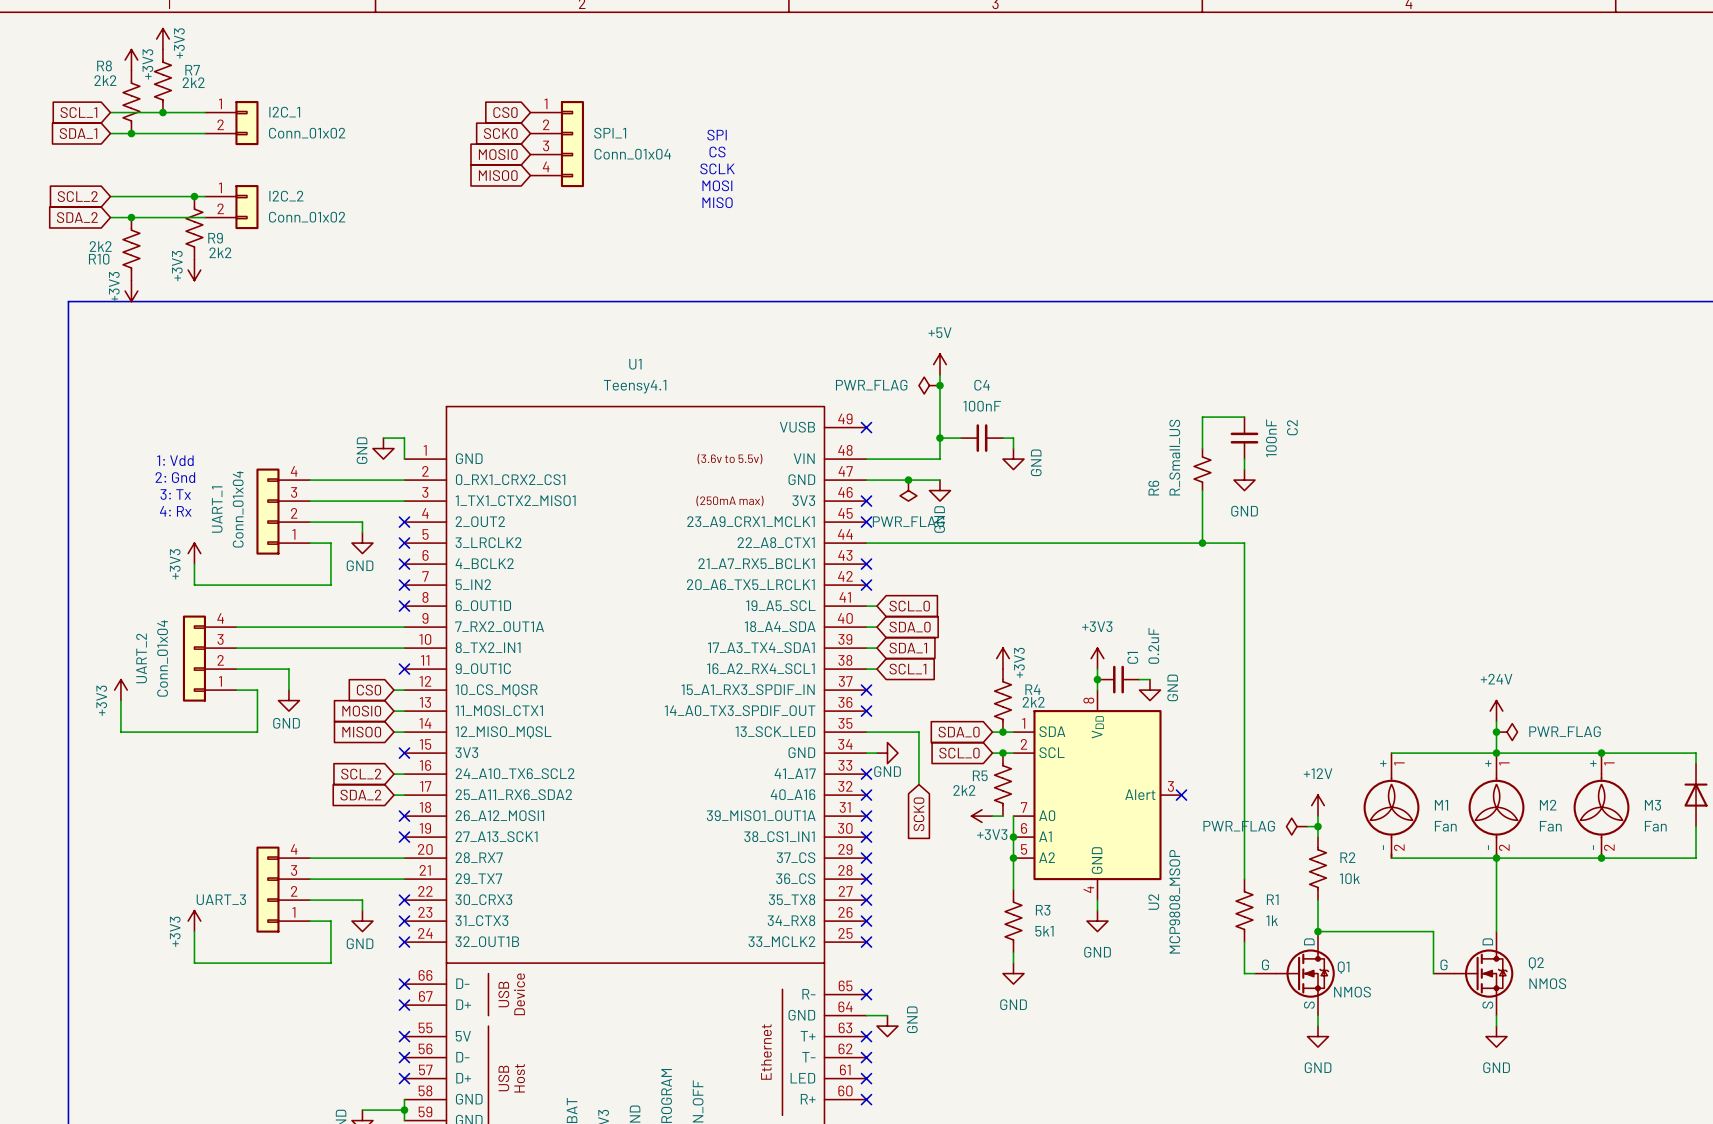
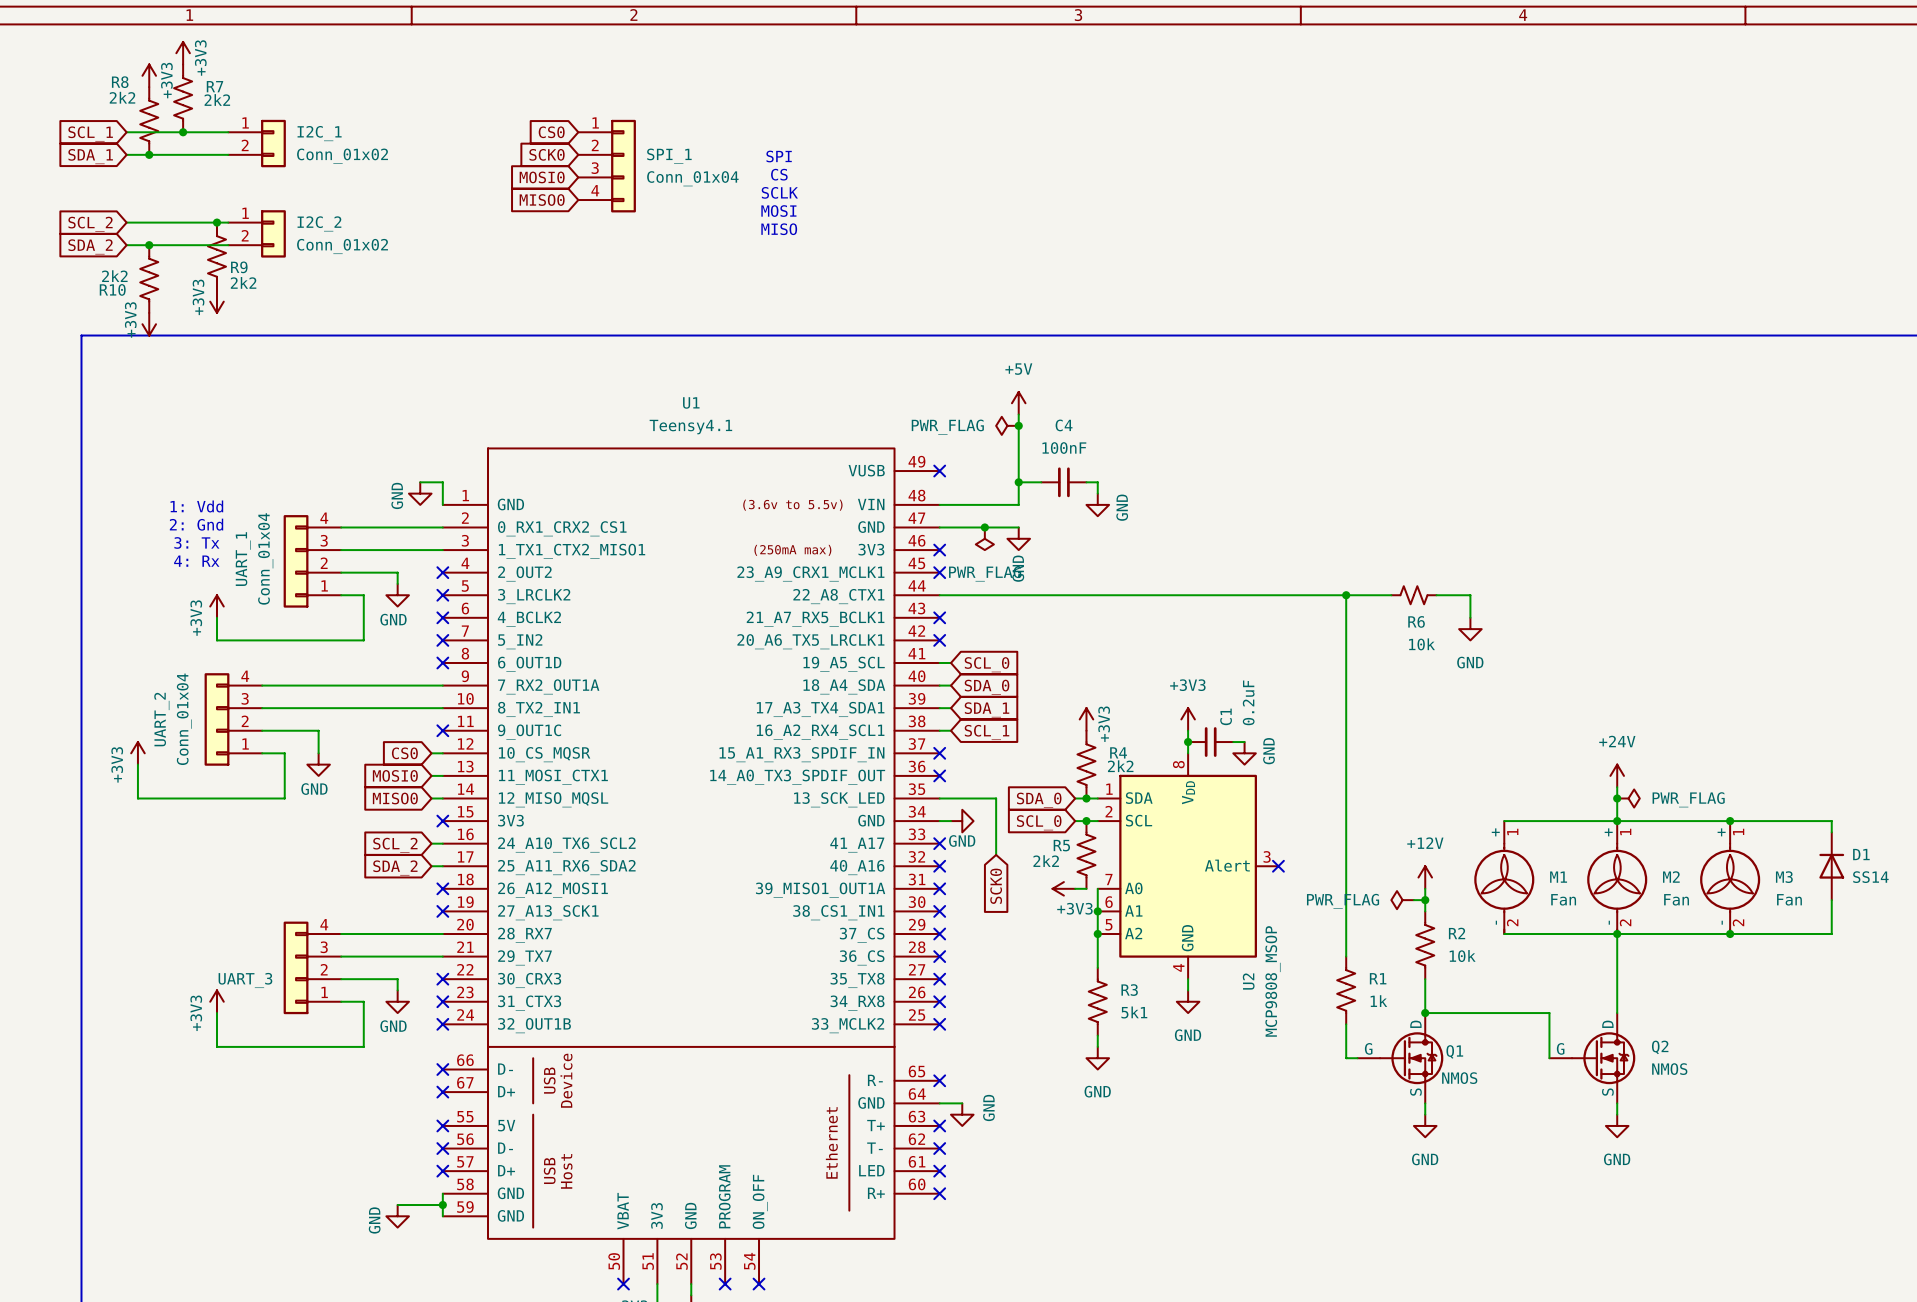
wire: (1244, 417) (1202, 417) (1202, 448) -> none
C2: 100nF (1244, 438) -> none
R6 value: R_Small_US (1174, 457) -> 10k (1421, 644)
wire: (1244, 459) (1244, 469) -> none
R6 rotation: 0° (1202, 469) -> 90° clockwise (1413, 595)
R6 position: (1202, 469) -> (1413, 595)
power symbol position: GND (1244, 480) -> GND (1470, 629)
R6 name position: R6 (1153, 488) -> R6 (1416, 621)
wire: (1202, 490) (1202, 543) -> none
junction position: (1202, 543) -> (1346, 595)
wire: none -> (1346, 595) (1391, 595)
wire: none -> (1436, 595) (1470, 595) (1470, 617)

